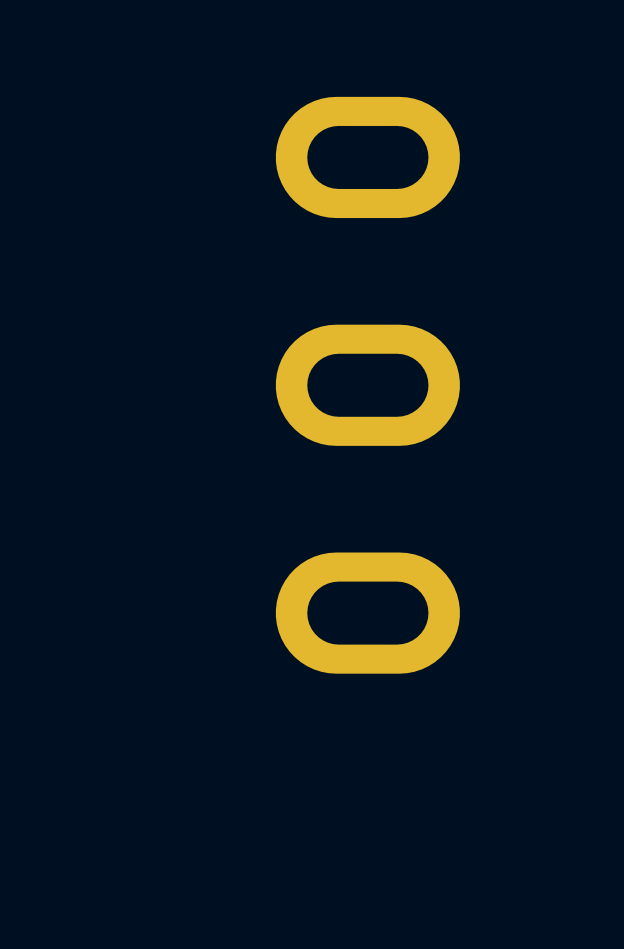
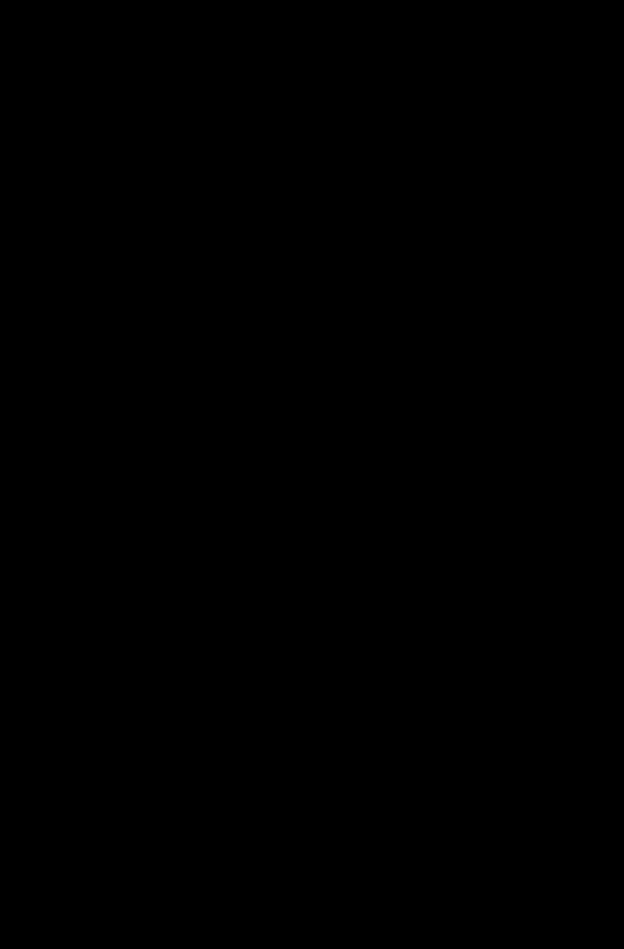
part: (367, 385) -> none

